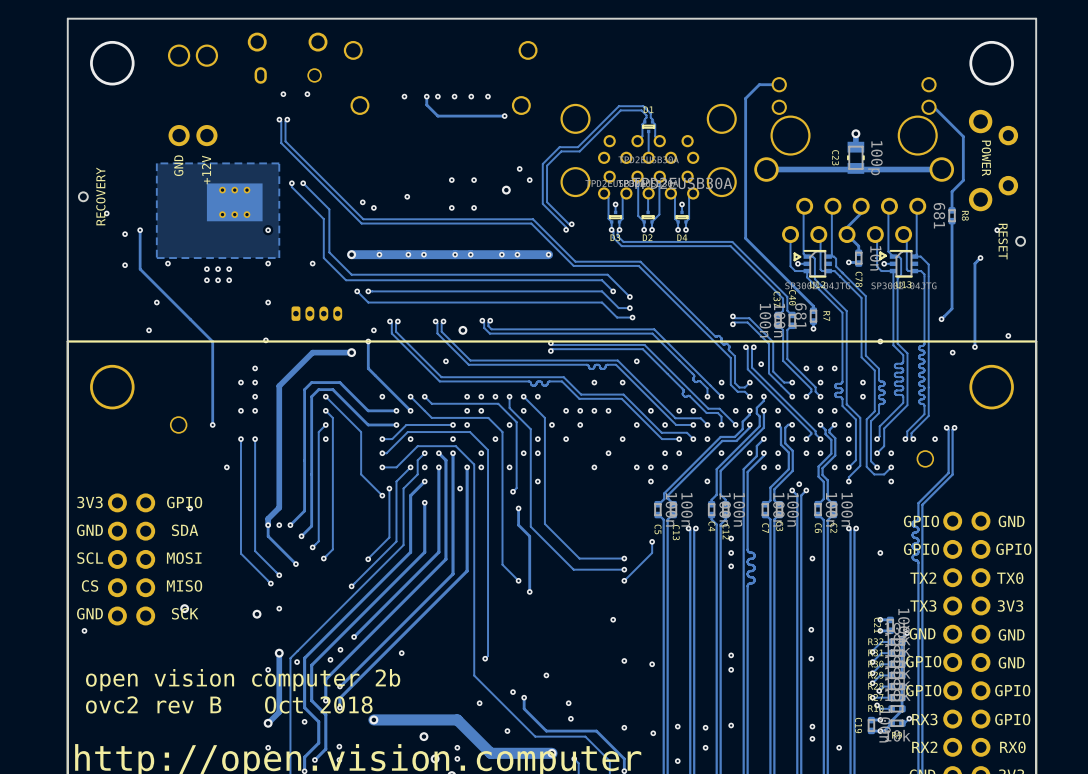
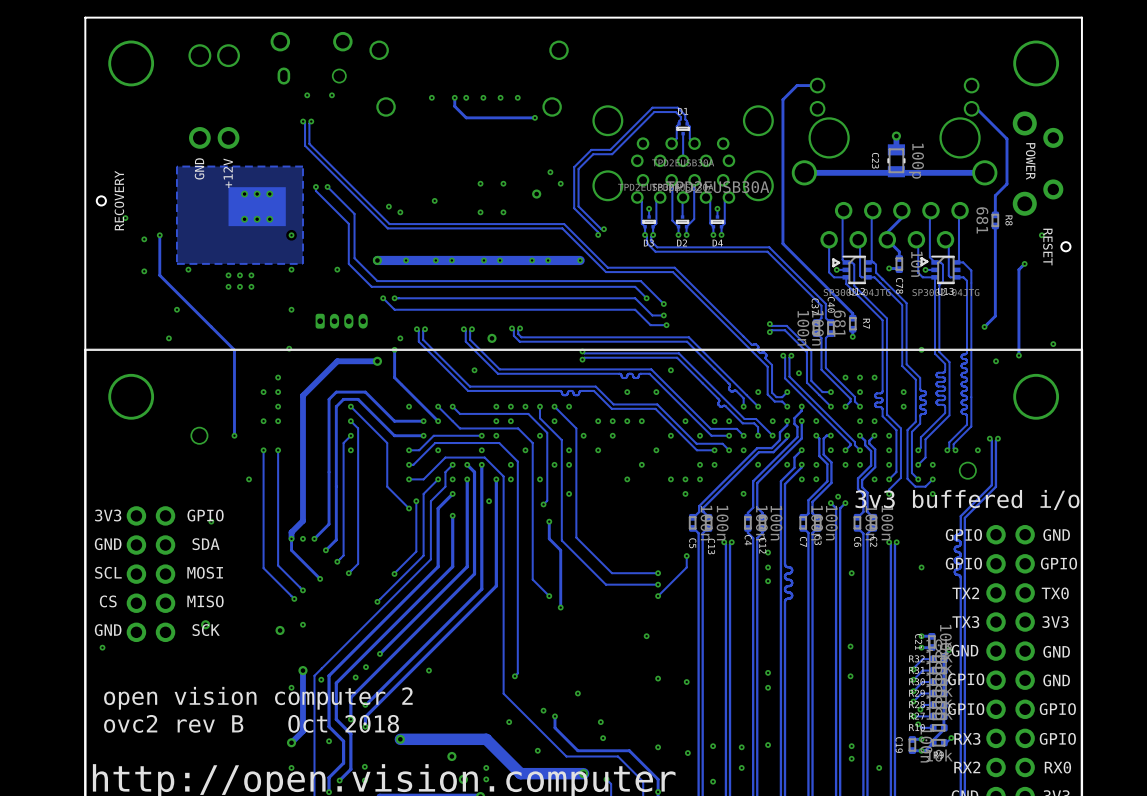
text: none -> 3v3 buffered i/o (967, 499)
text: open vision computer 2b (243, 680) -> open vision computer 2 (258, 698)

